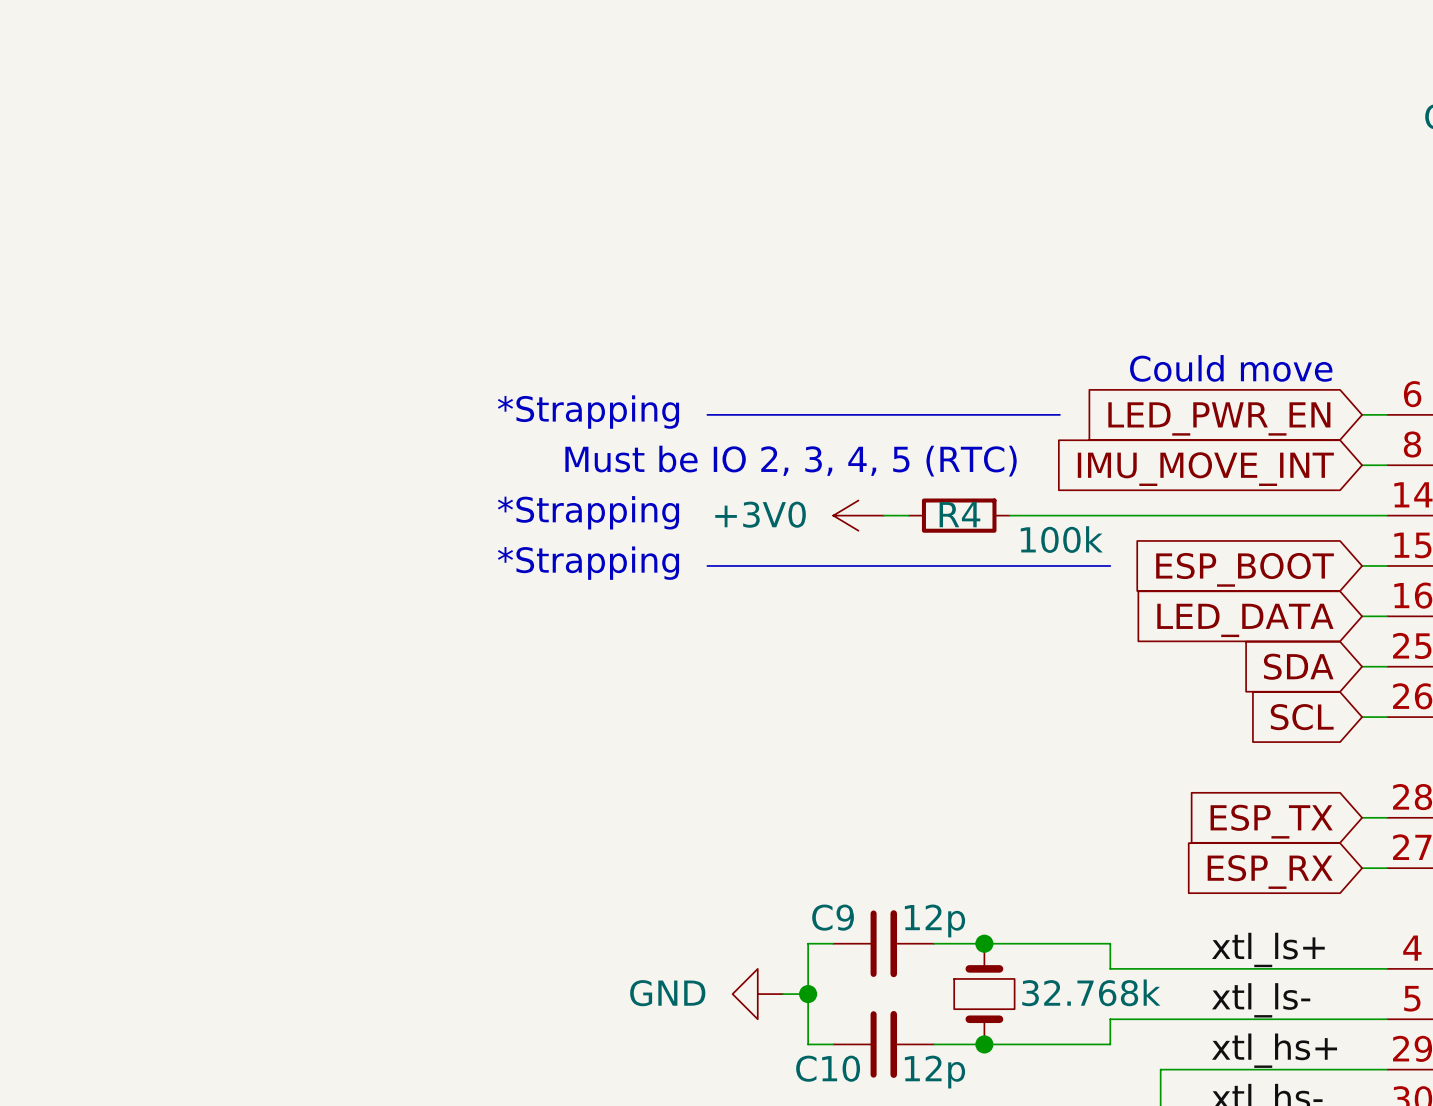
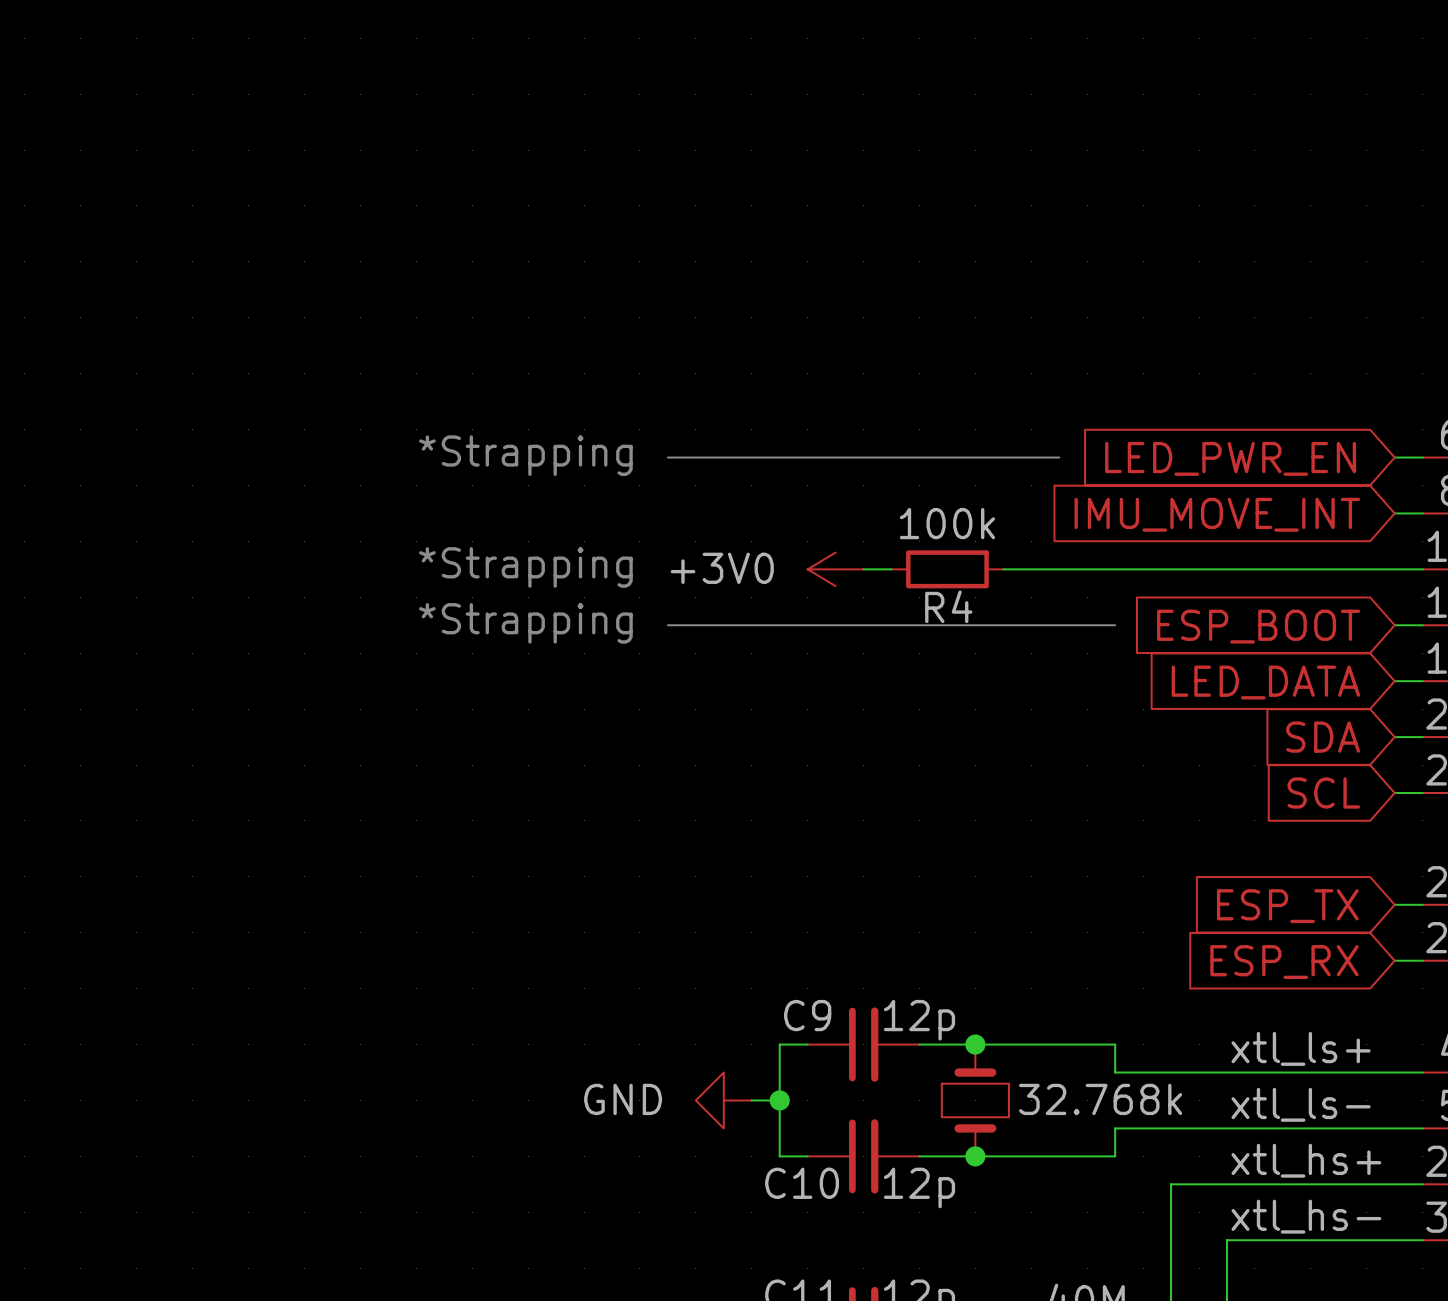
text: Could move (1231, 368) -> none
text: Must be IO 2, 3, 4, 5 (RTC) (791, 461) -> none
R4 name position: R4 (959, 514) -> R4 (948, 606)
R4 value position: 100k (1061, 539) -> 100k (947, 523)

